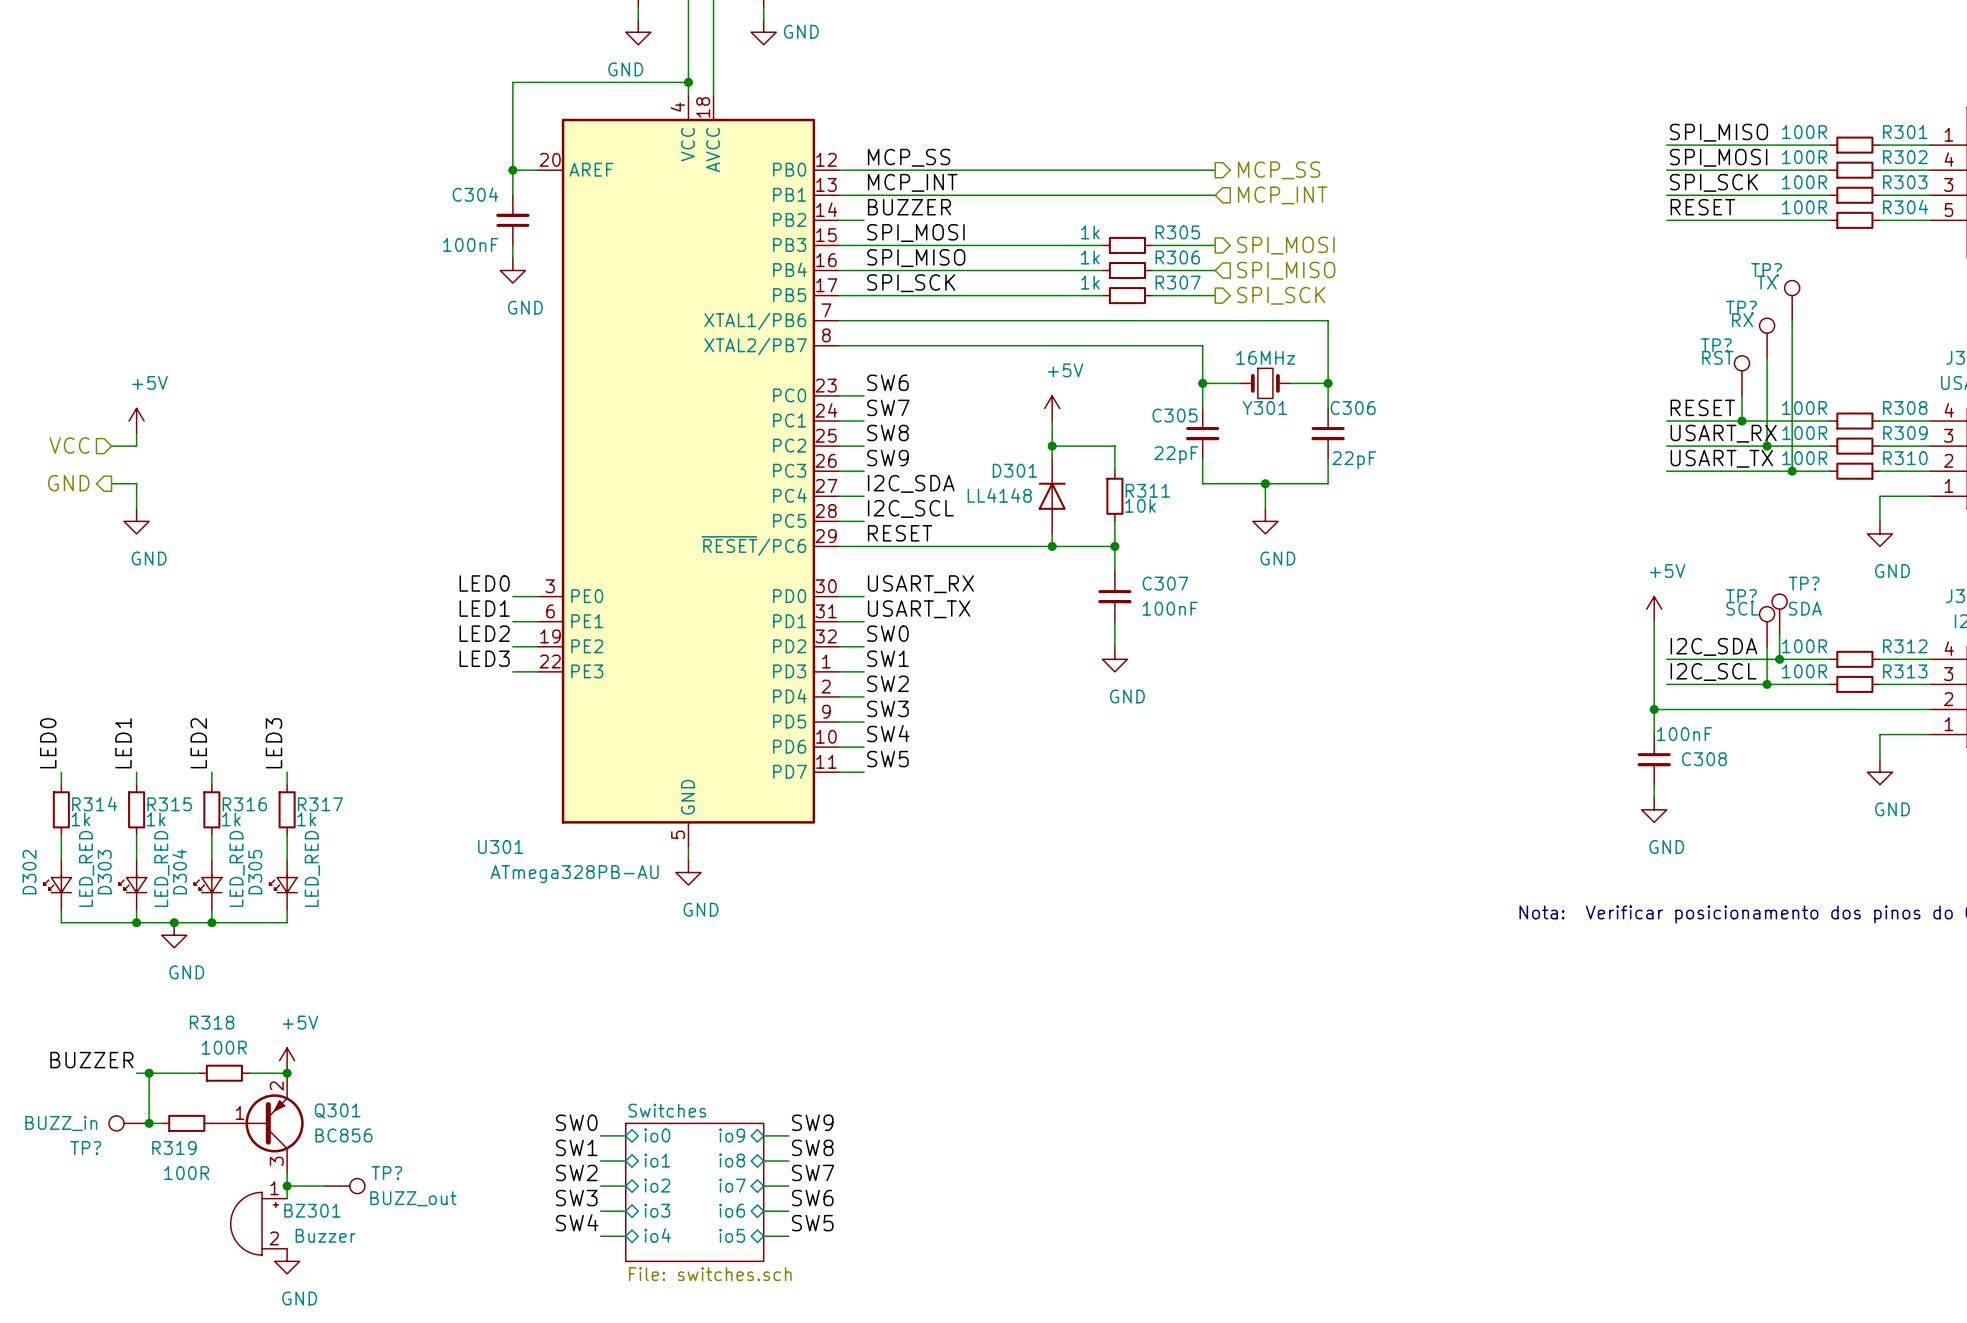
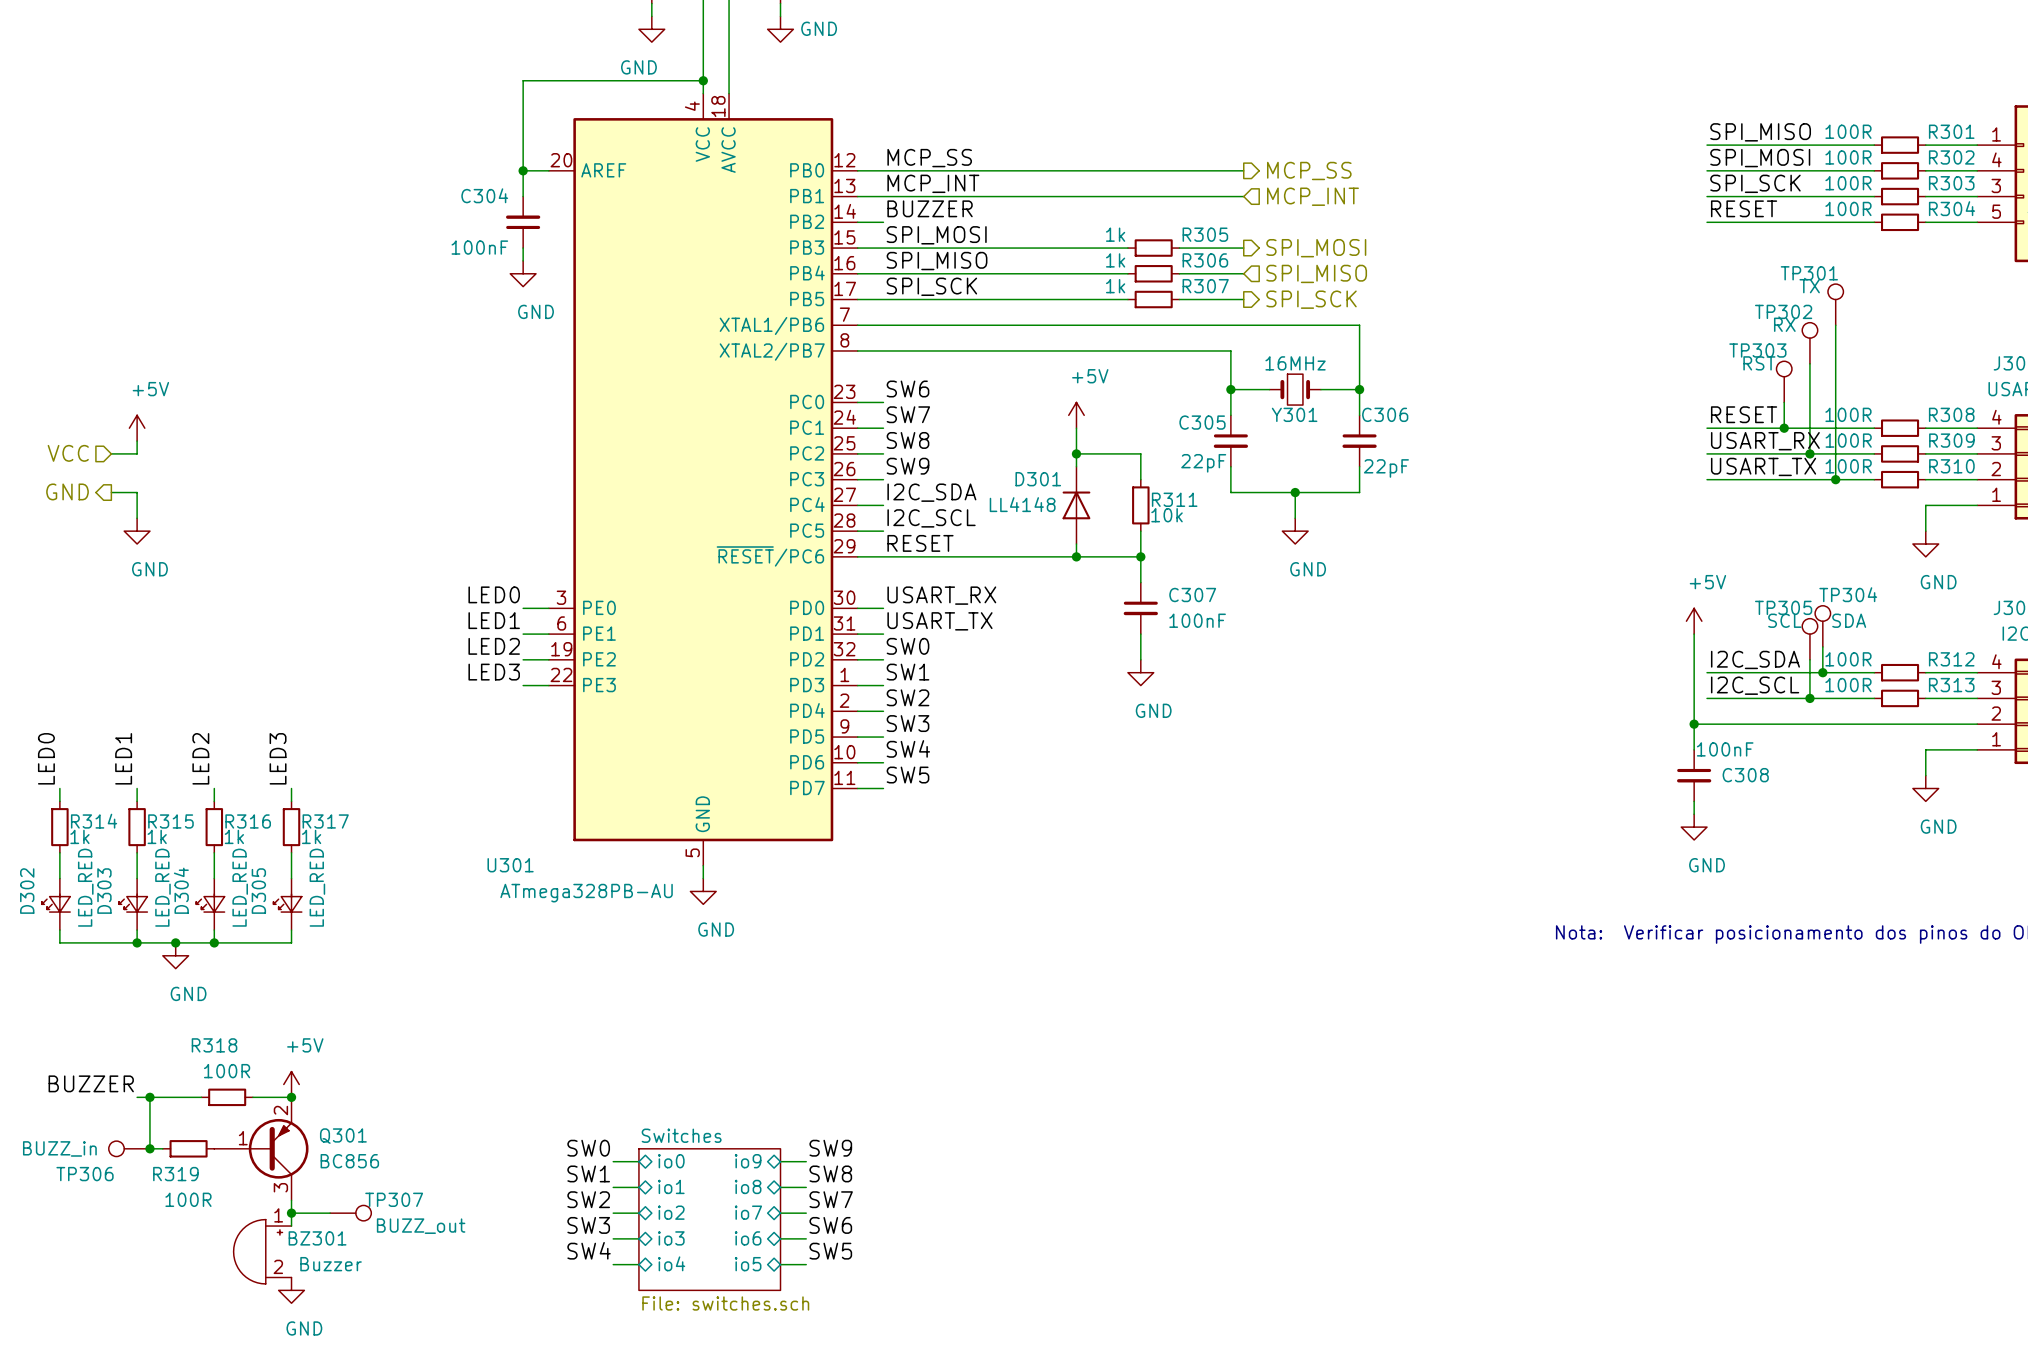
TP? name: TP? (1766, 270) -> TP301 (1809, 273)
TP? name: TP? (1741, 307) -> TP302 (1783, 311)
TP? name: TP? (1716, 345) -> TP303 (1757, 350)
TP? name: TP? (1804, 583) -> TP304 (1848, 594)
TP? name: TP? (1741, 596) -> TP305 (1783, 607)
TP? name: TP? (85, 1148) -> TP306 (85, 1174)
TP? name: TP? (386, 1173) -> TP307 (394, 1199)

